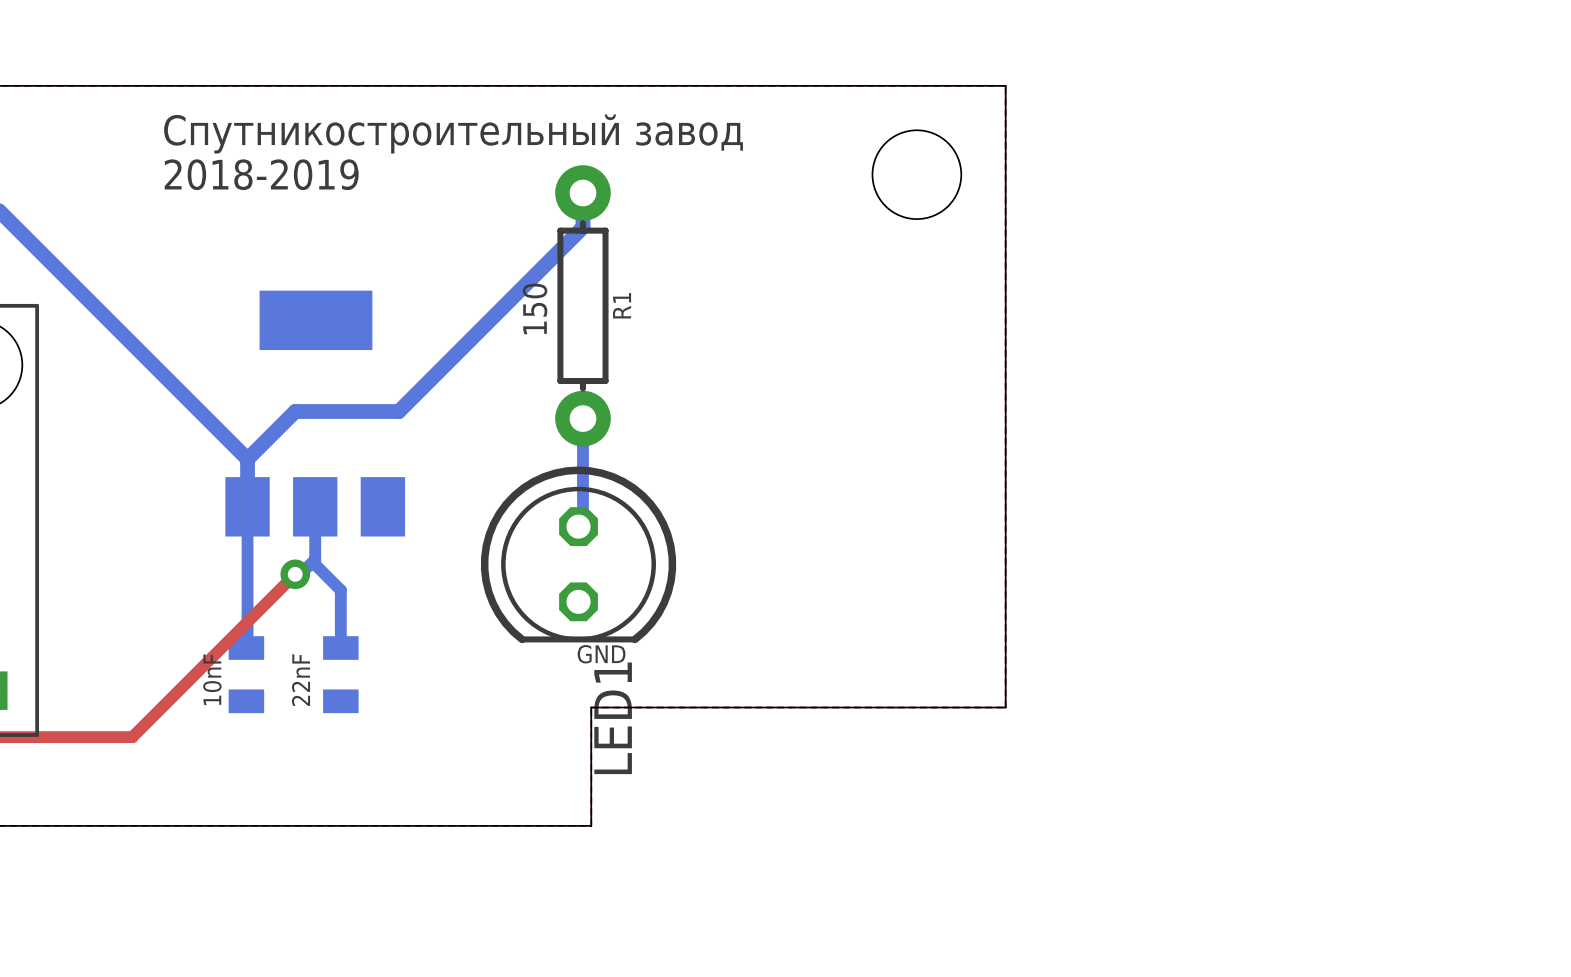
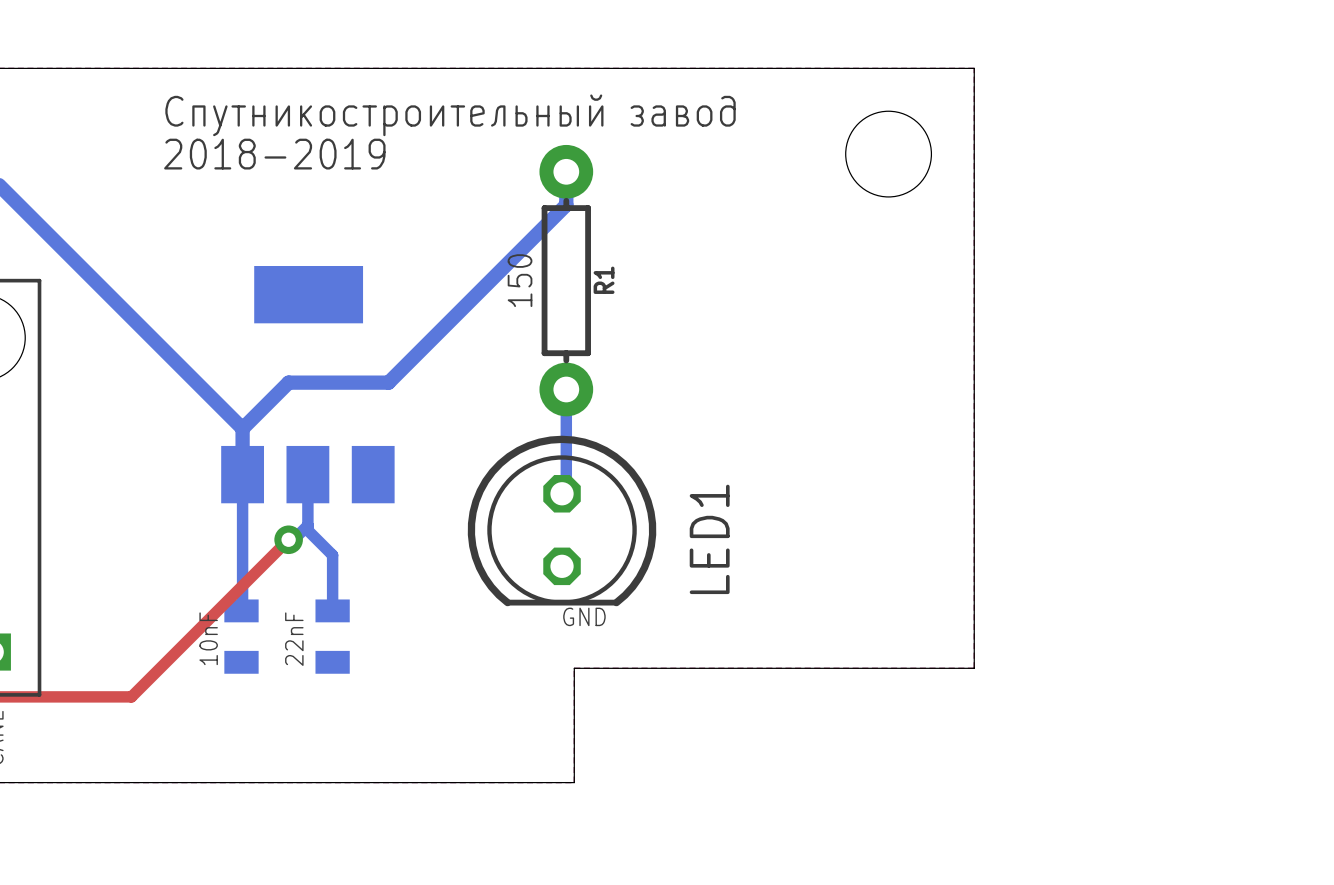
LED1 name position: LED1 (613, 718) -> LED1 (709, 539)

